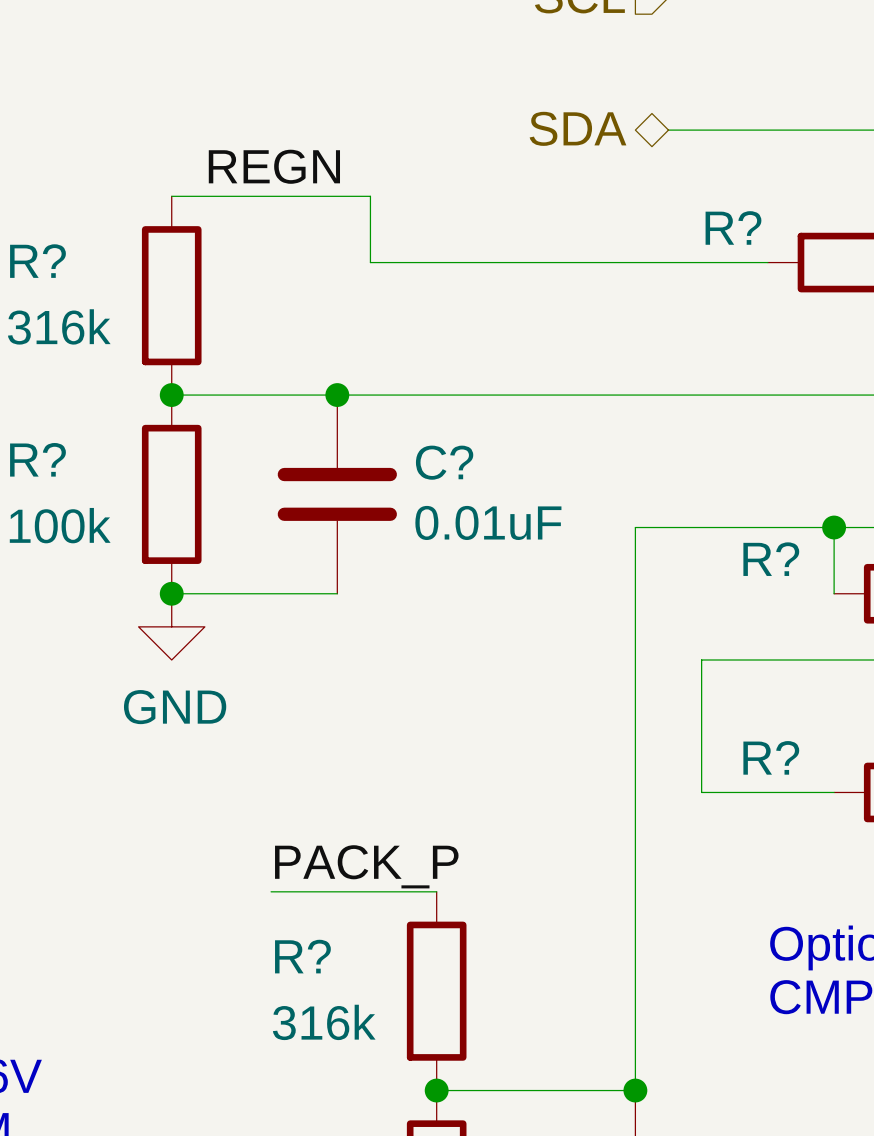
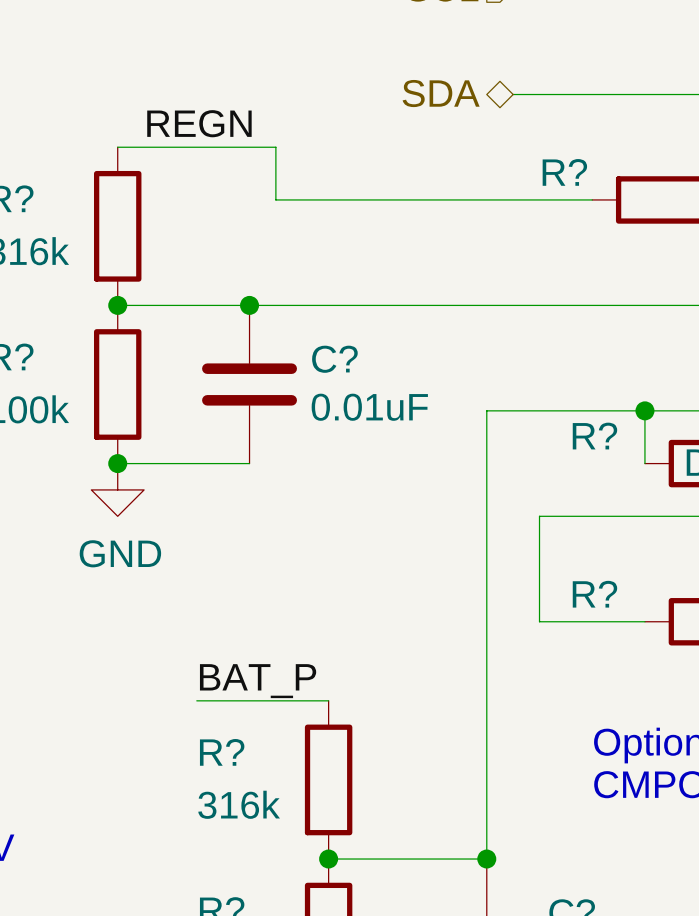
label: PACK_P (366, 866) -> BAT_P (258, 681)

